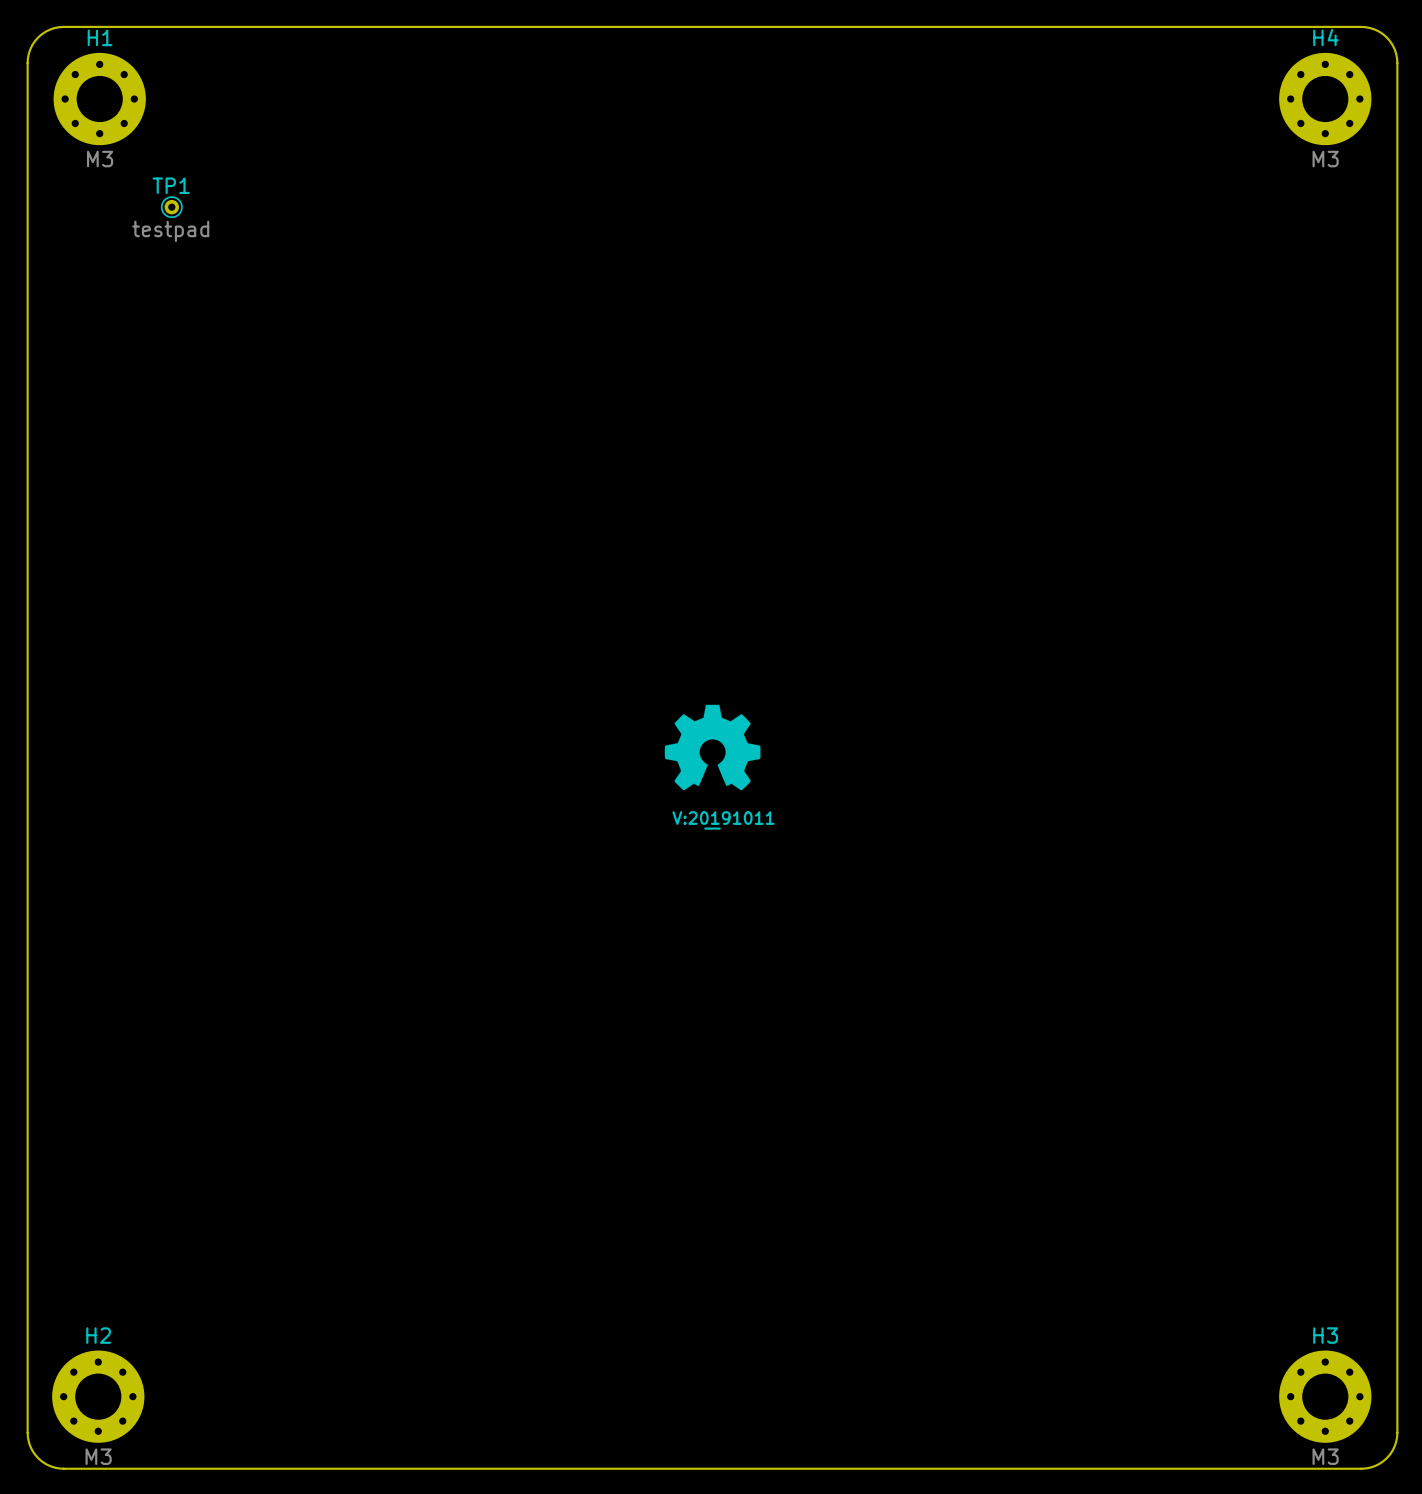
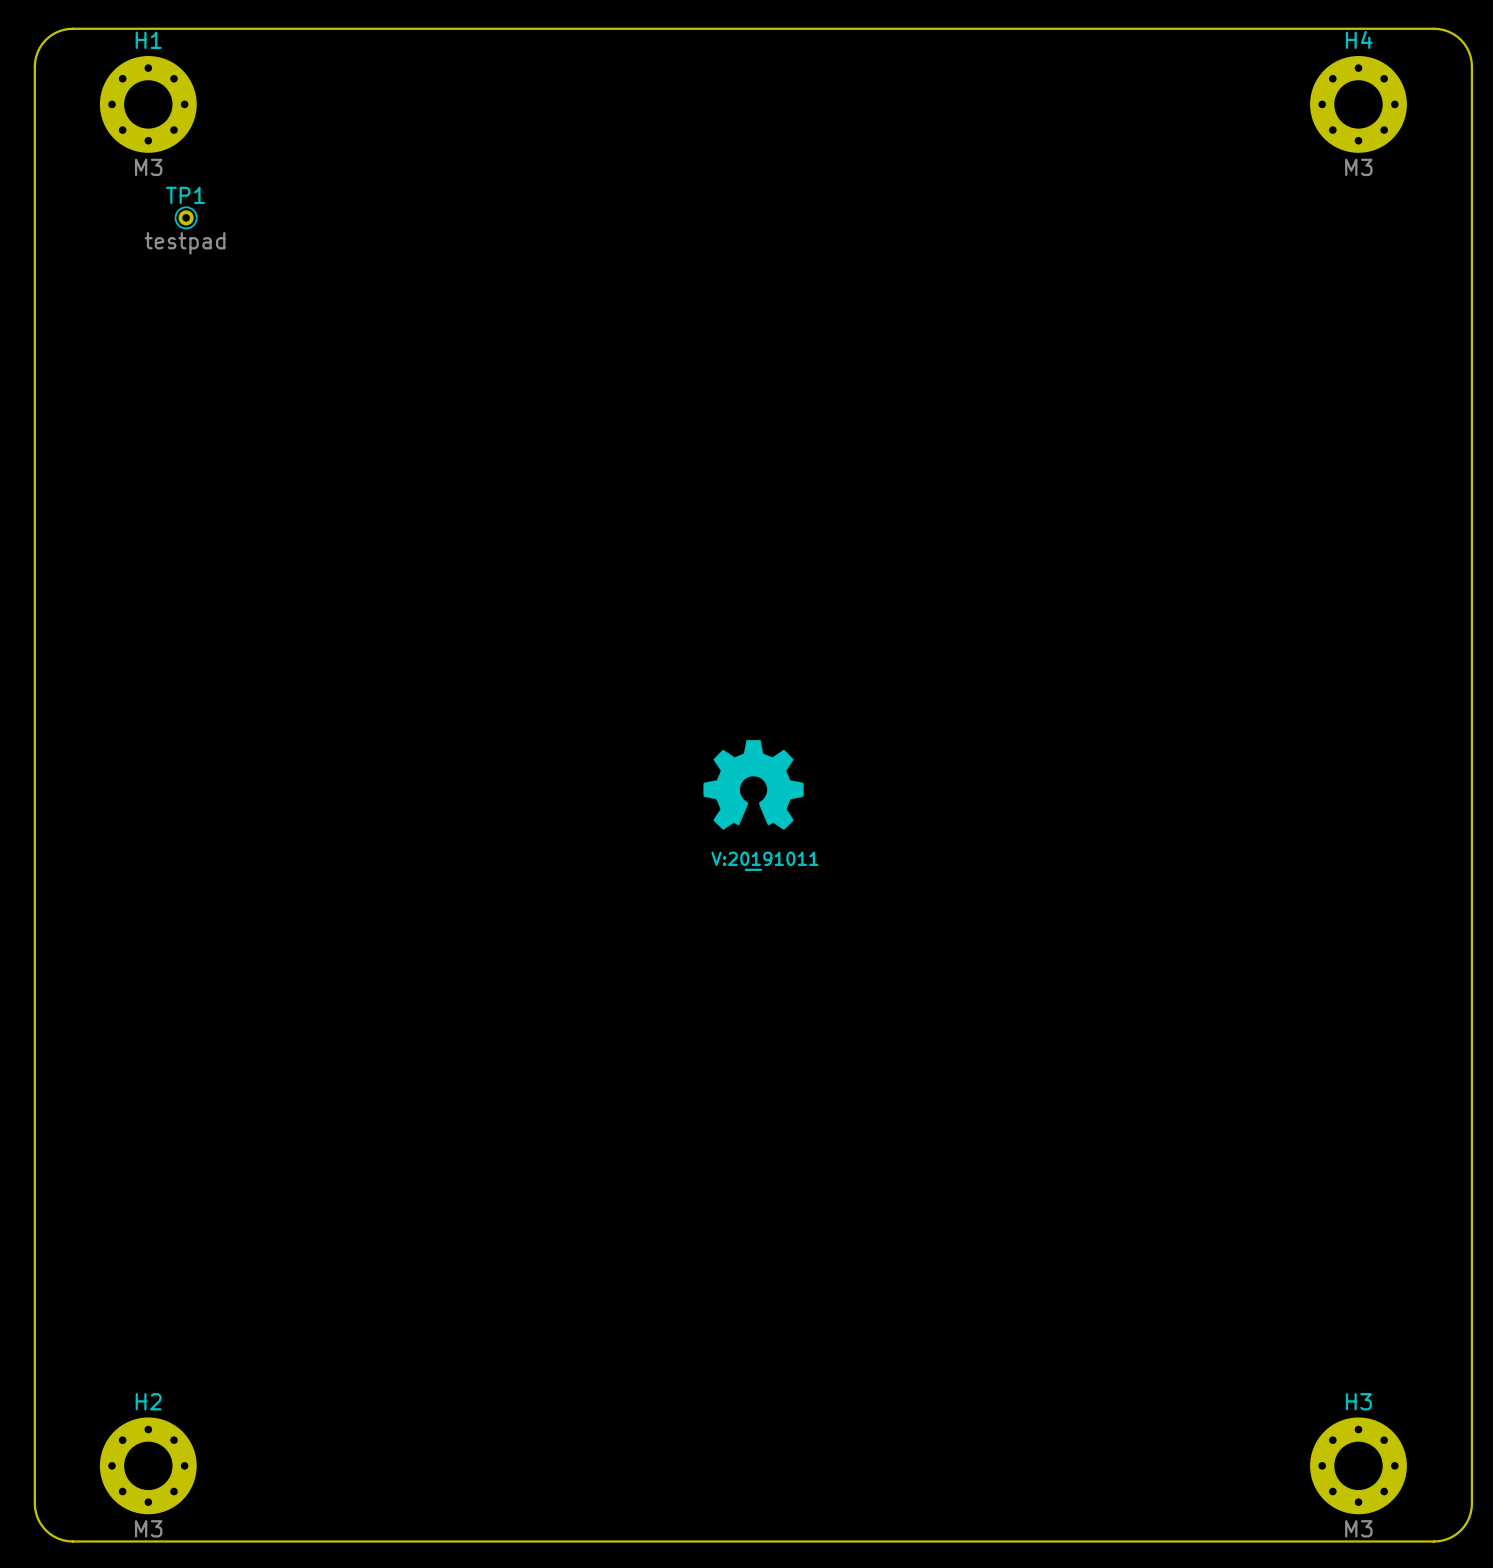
H1 position: (99, 99) -> (148, 104)
H4 position: (1325, 99) -> (1358, 104)
H2 position: (98, 1396) -> (148, 1465)
H3 position: (1325, 1396) -> (1358, 1465)

